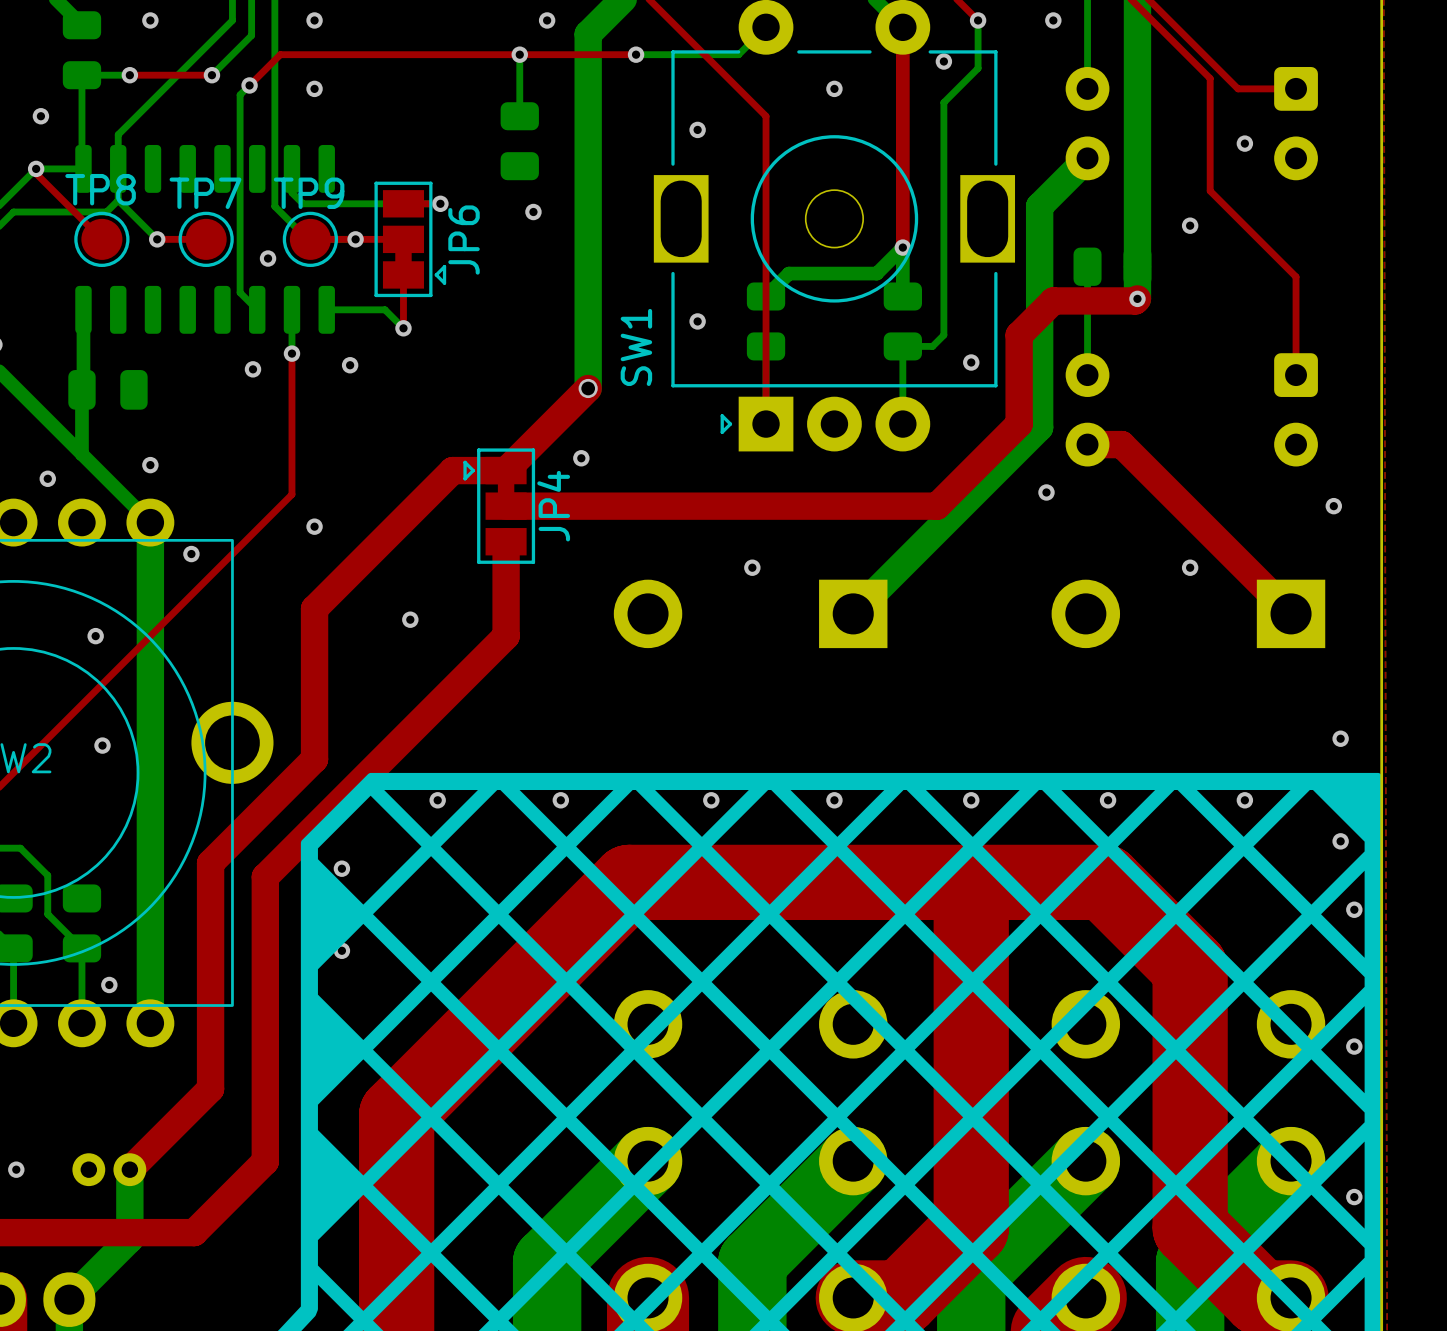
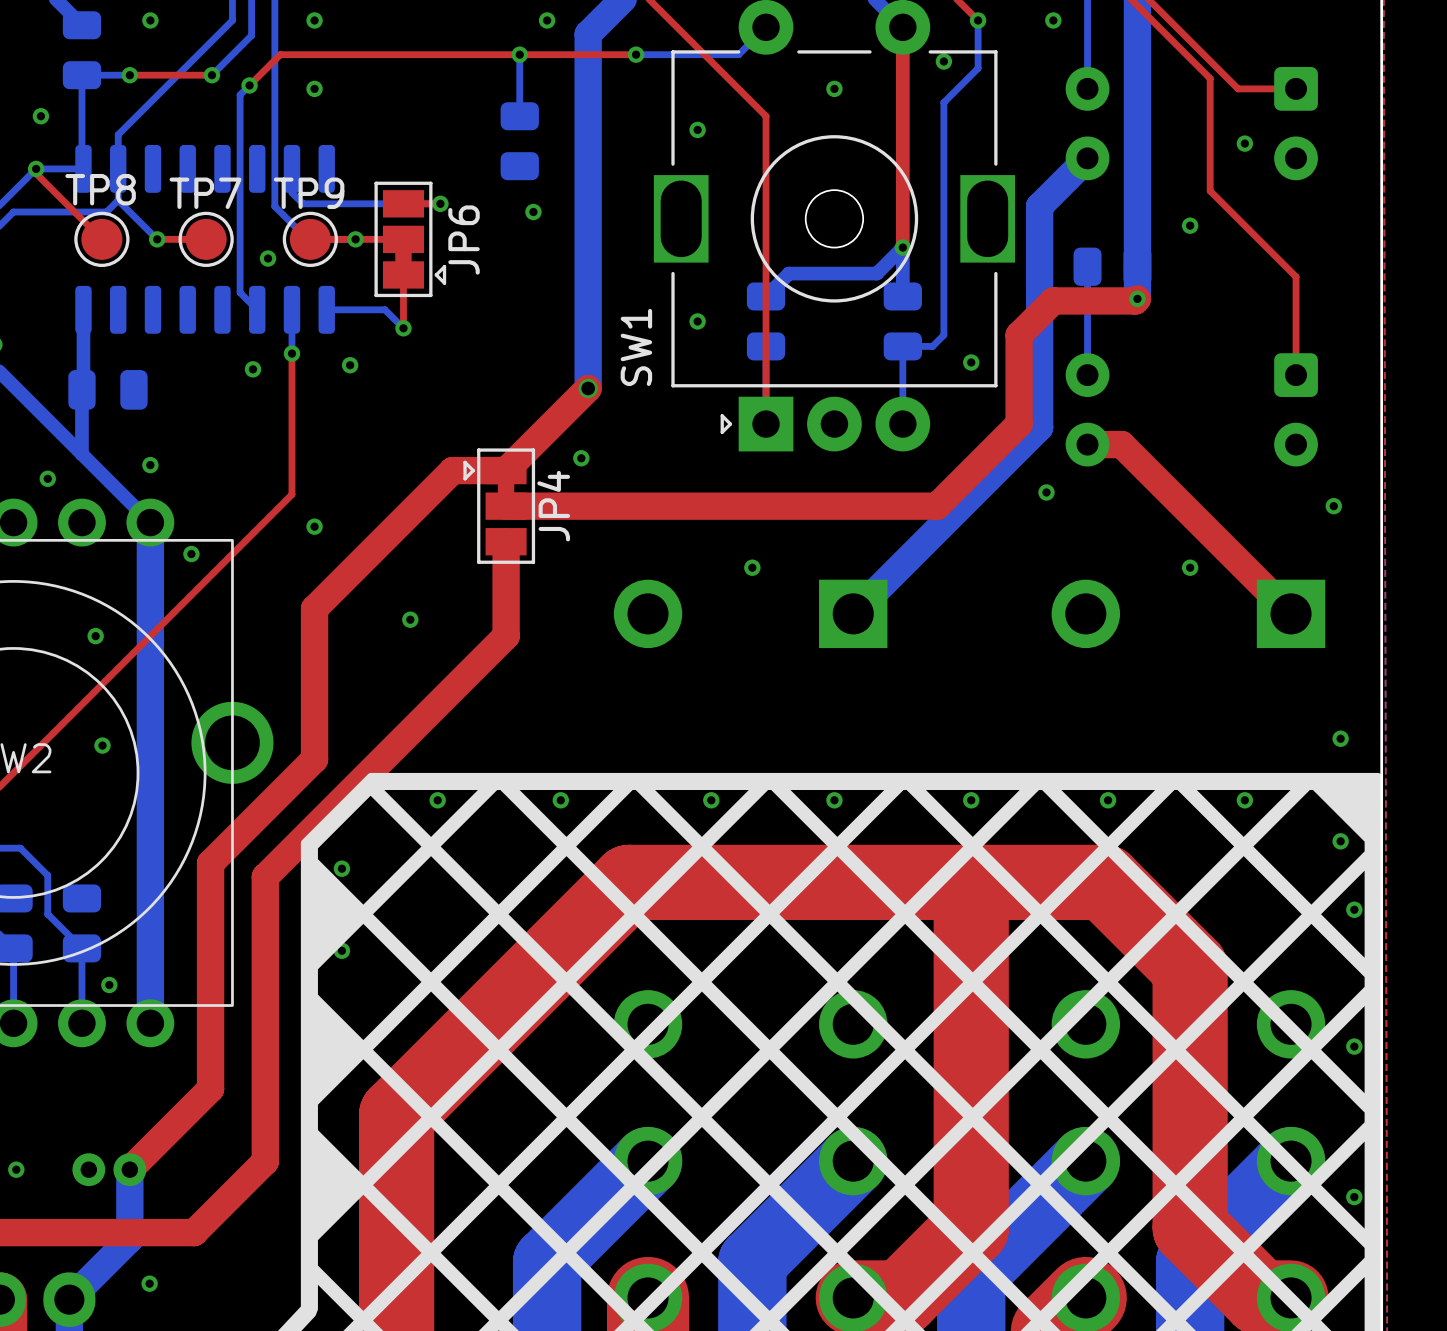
via: none -> (149, 1283)

